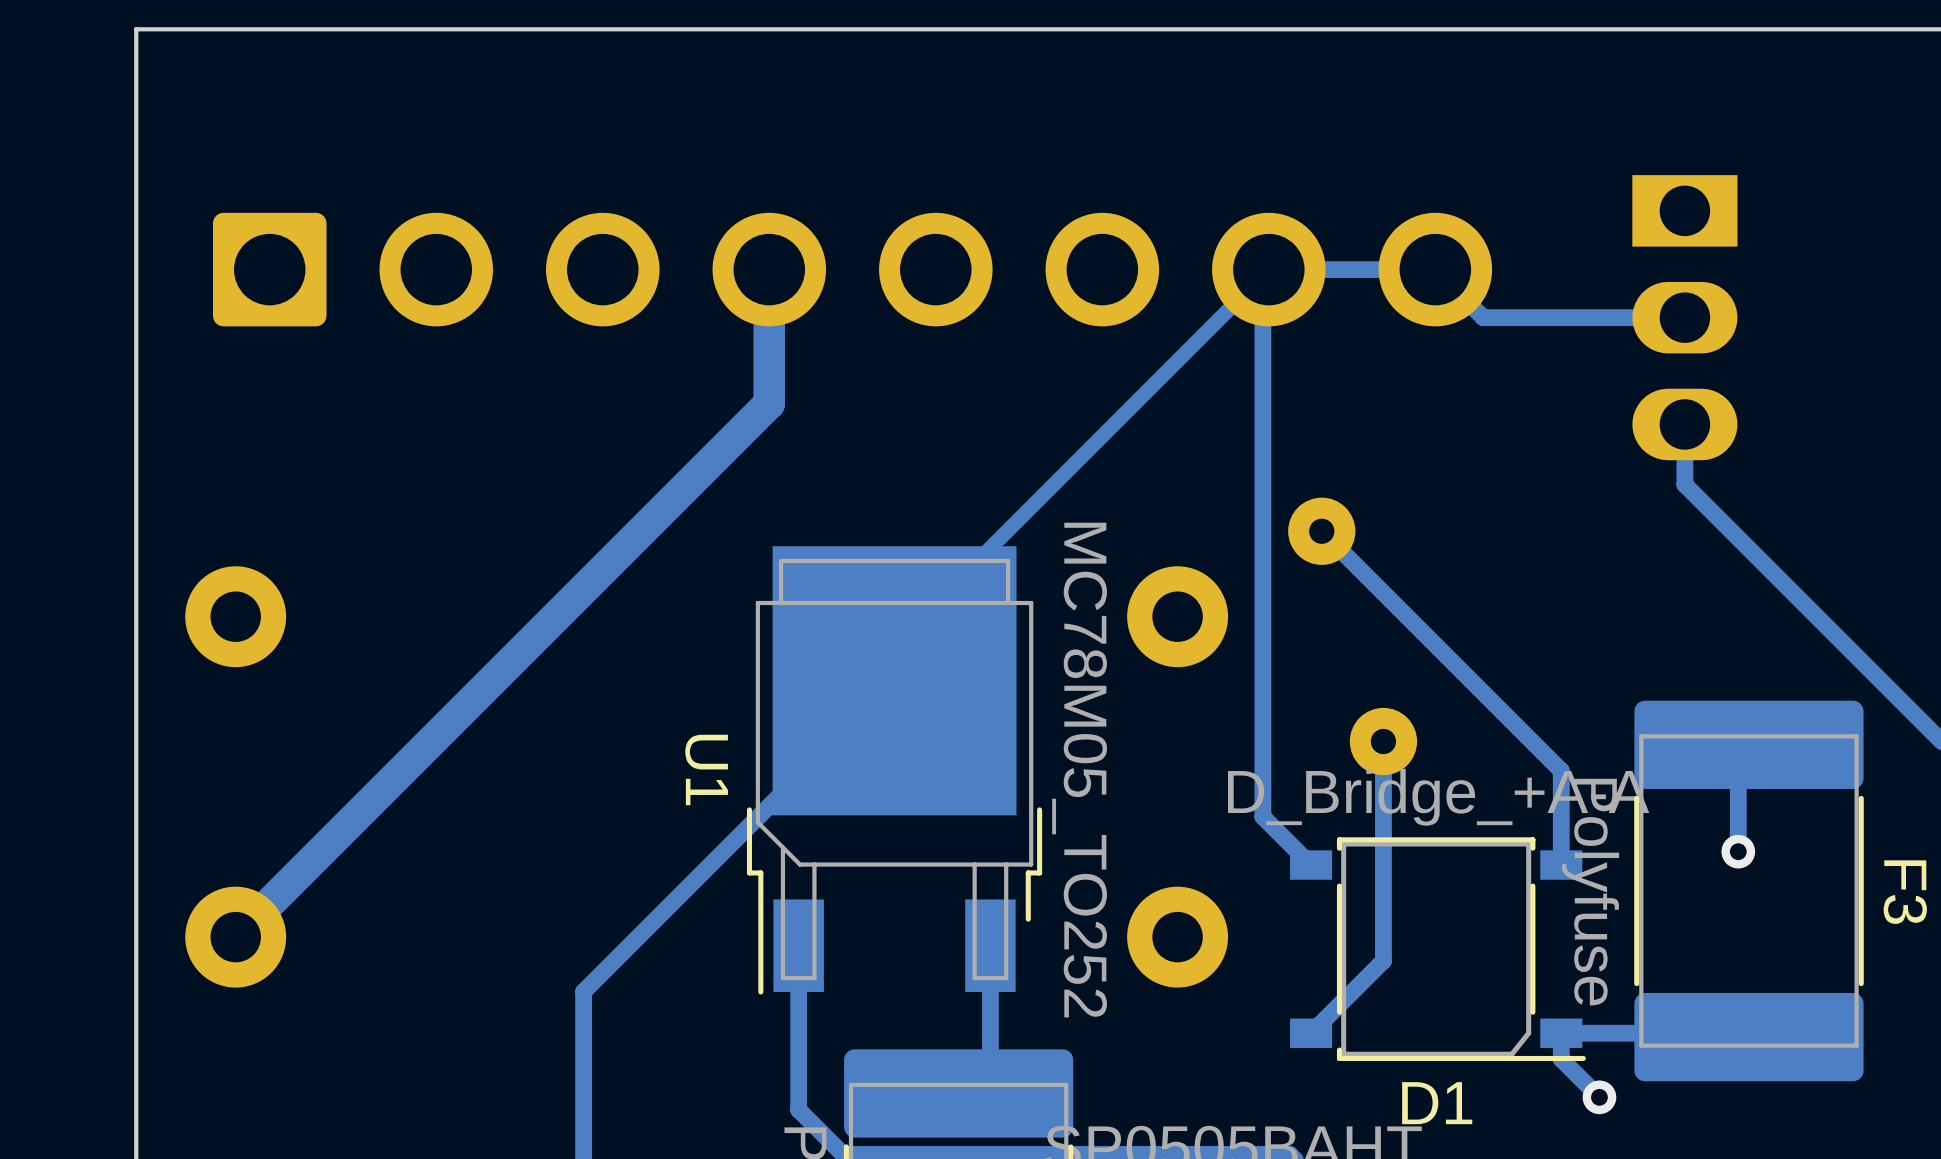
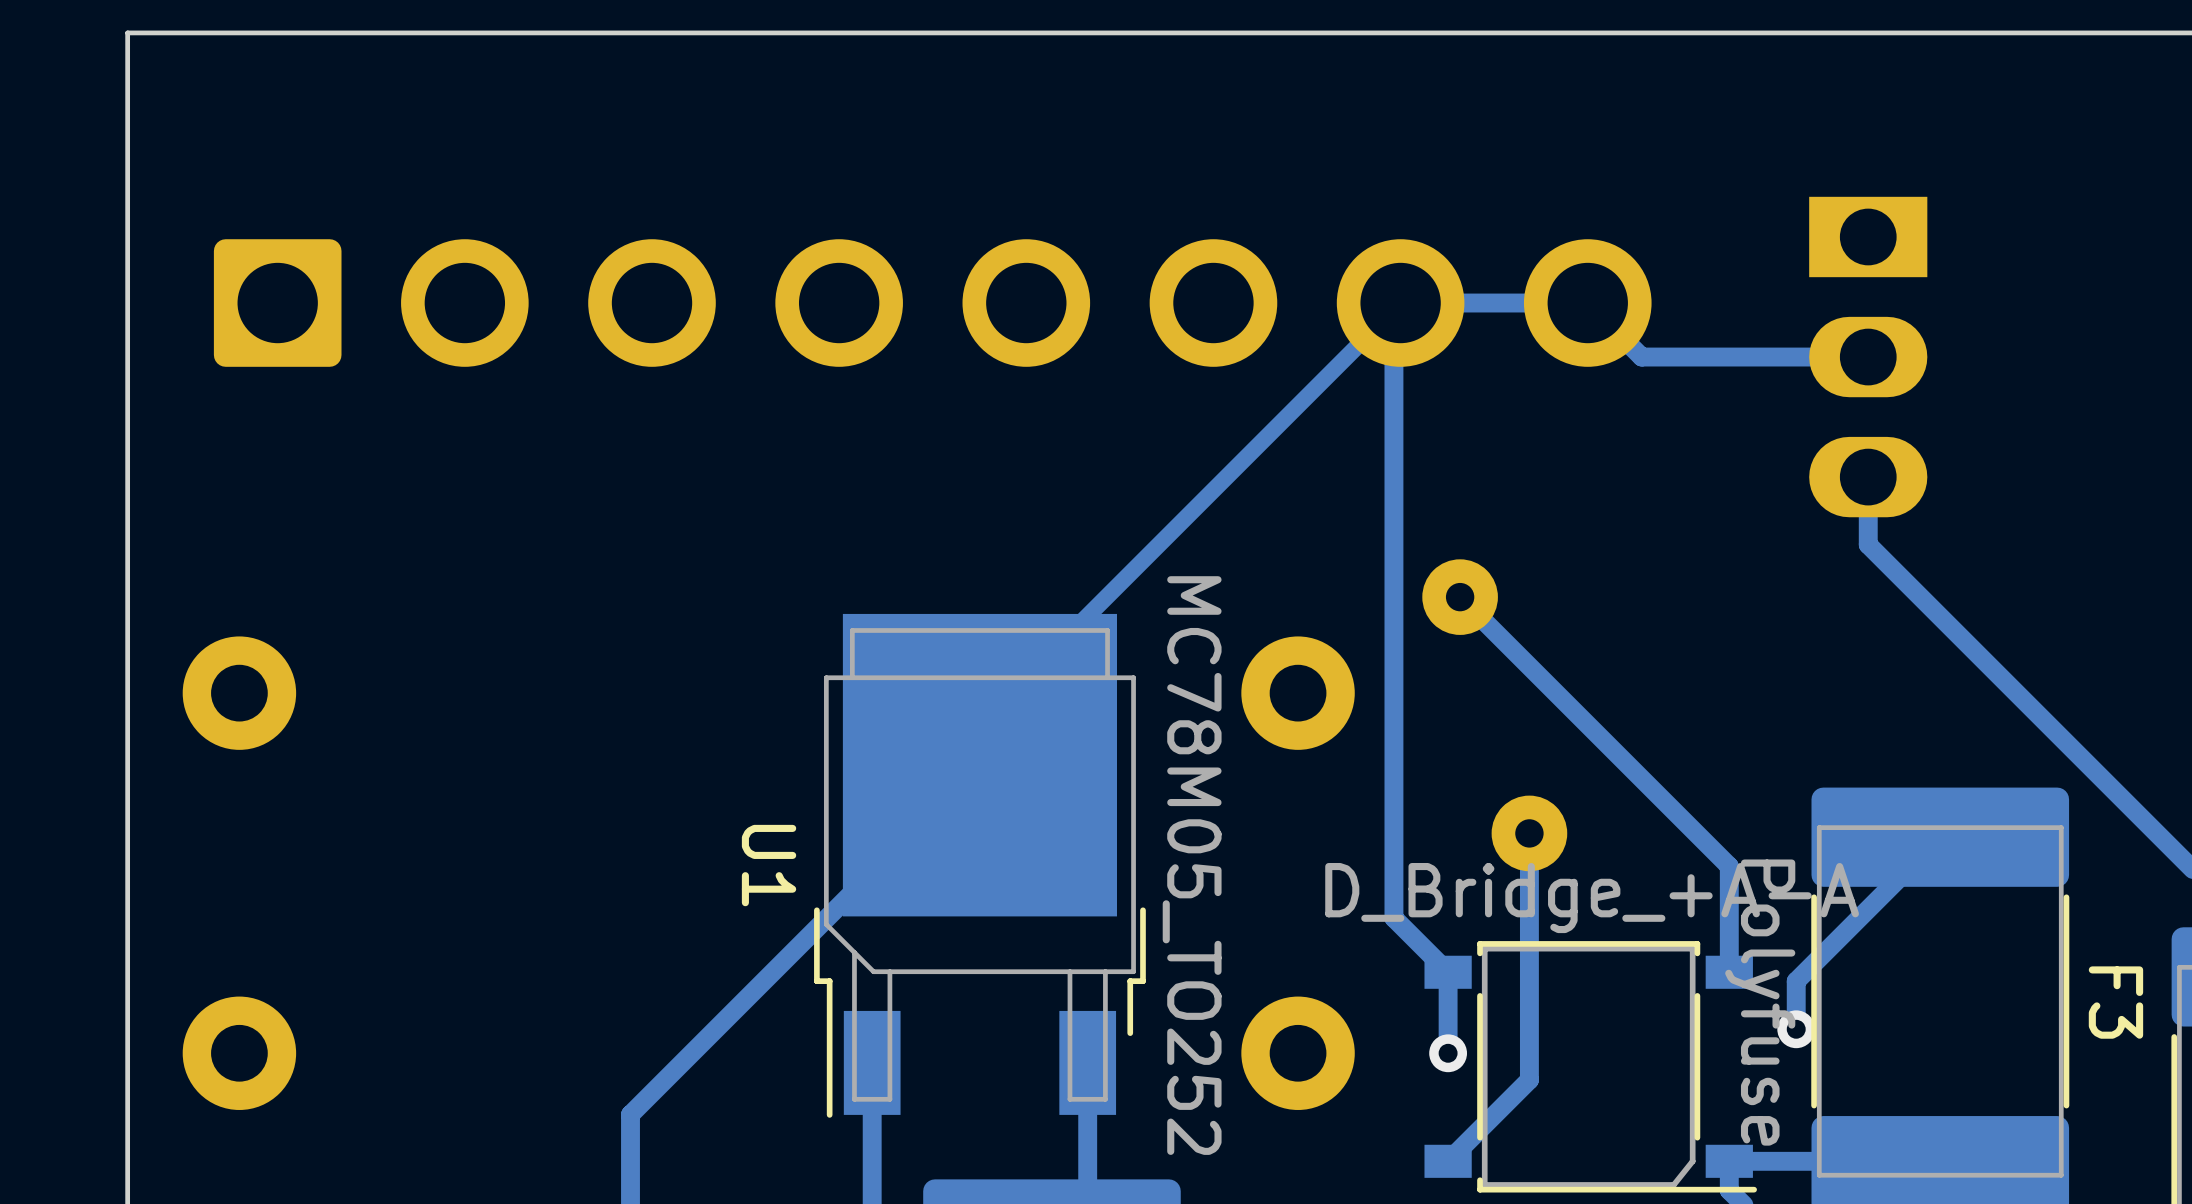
track: (769, 269) (769, 403) (235, 937) -> none
track: (1738, 755) (1738, 851) -> (1928, 849) (1796, 981) (1796, 1029)
via position: (1738, 851) -> (1796, 1029)
track: none -> (1448, 972) (1448, 1053)
via: none -> (1448, 1053)

